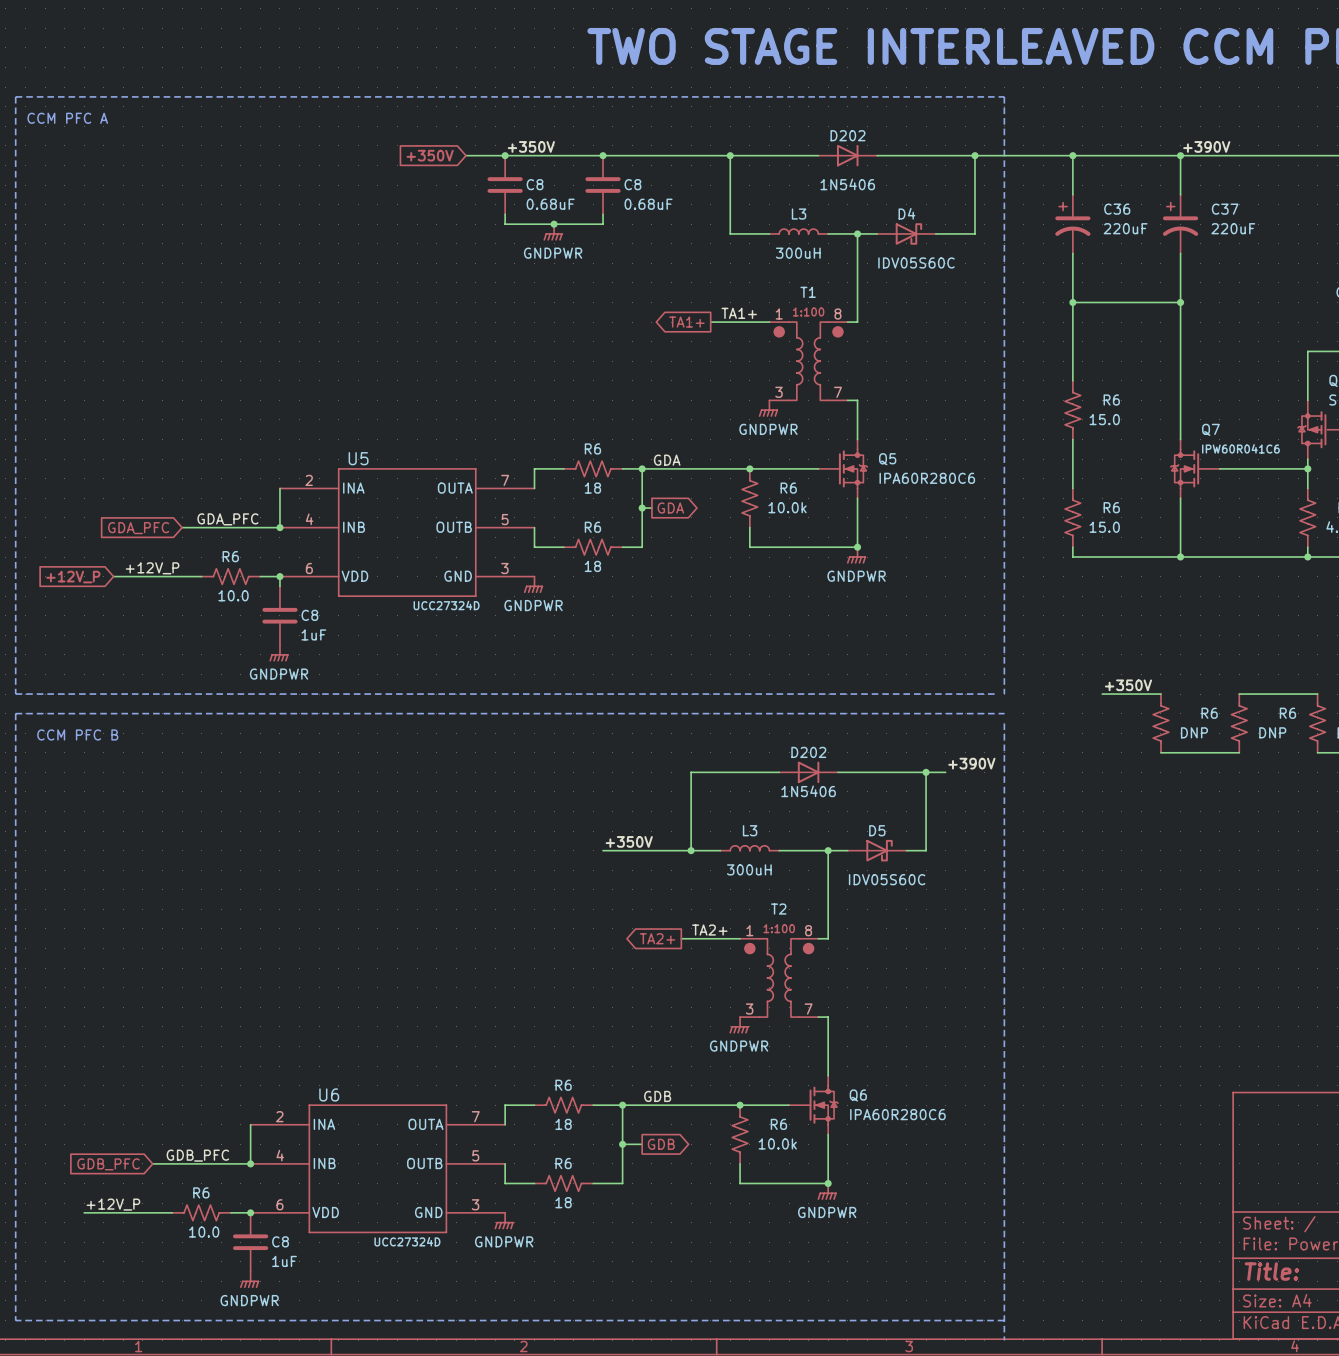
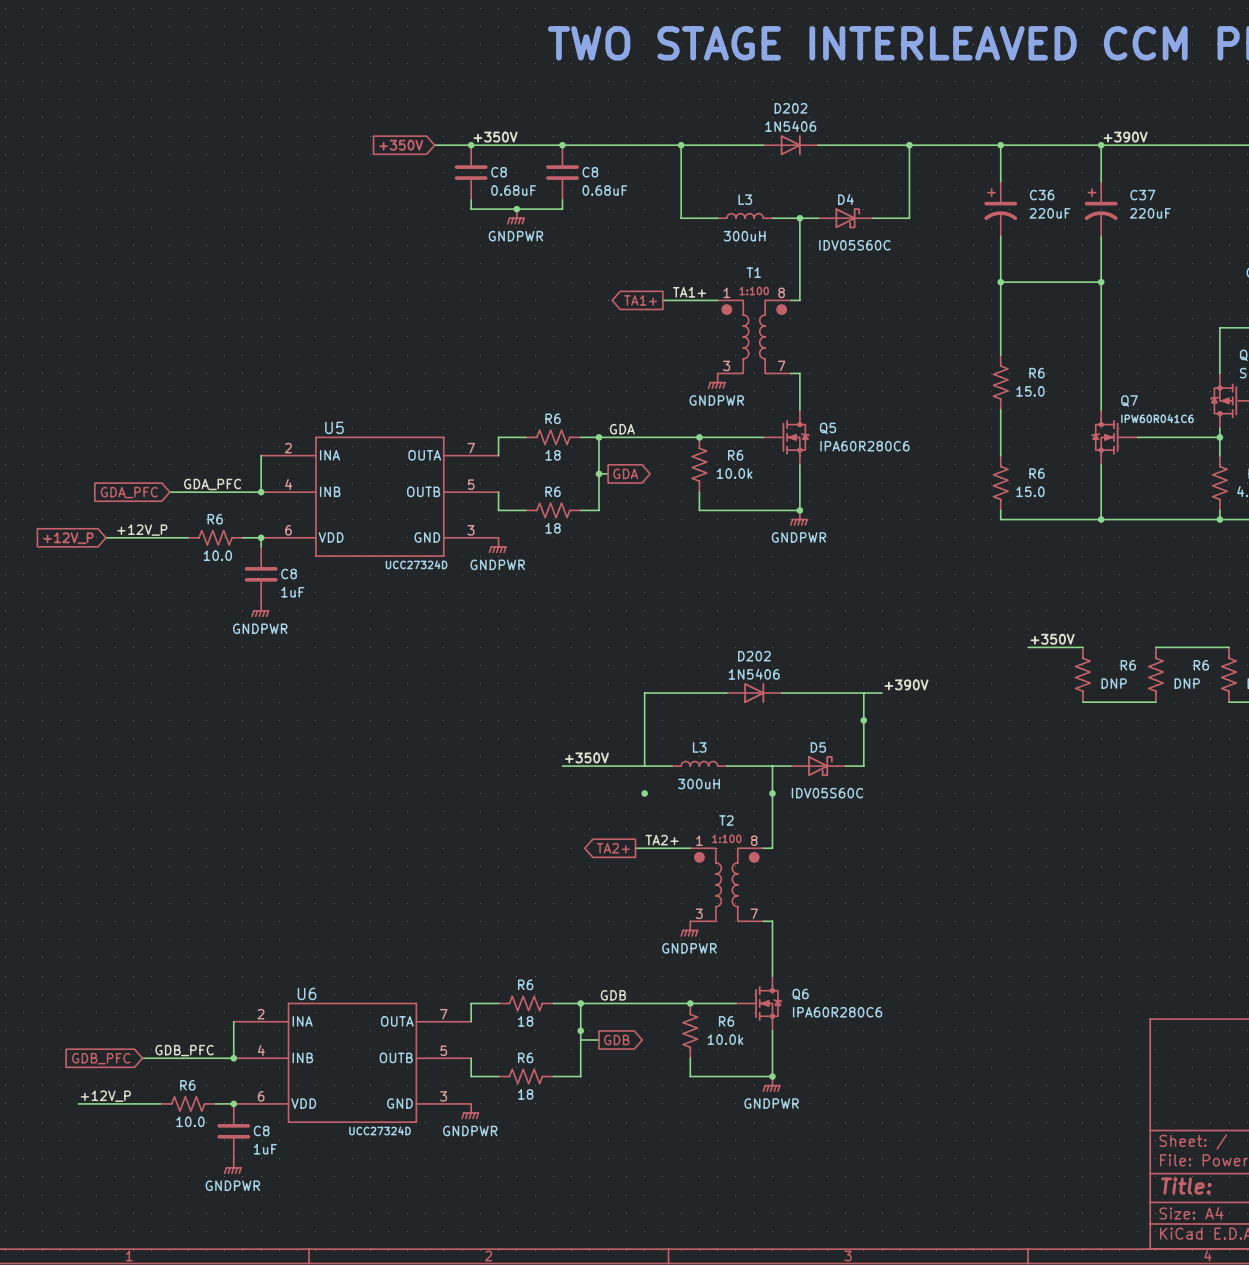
text: CCM PFC A (67, 118) -> none
D202 name position: D202 (847, 135) -> D202 (790, 108)
D202 value position: 1N5406 (847, 184) -> 1N5406 (790, 126)
line: (994, 694) (15, 694) (15, 96) (1004, 96) (1004, 694) -> none
line: (1004, 713) (15, 713) (15, 1320) (1004, 1320) -> none
line: (1004, 723) (1004, 1340) -> none
text: CCM PFC B (77, 734) -> none
wire: none -> (863, 693) (863, 720)
D202 name position: D202 (808, 752) -> D202 (754, 656)
label position: +390V (971, 763) -> +390V (906, 684)
wire: (691, 772) (779, 772) -> (644, 720) (644, 693) (726, 693)
D202 position: (808, 772) -> (754, 693)
wire: (837, 772) (945, 772) -> (781, 693) (882, 693)
D202 value position: 1N5406 (808, 791) -> 1N5406 (754, 674)
wire: (691, 821) (691, 850) -> (772, 766) (772, 793)
wire: (926, 821) (926, 850) (906, 850) -> (863, 766) (845, 766)
label position: +350V (629, 841) -> +350V (586, 757)
L3 position: (749, 848) -> (699, 763)
wire: (603, 850) (720, 850) -> (562, 766) (672, 766)
wire: (779, 850) (847, 850) -> (726, 766) (790, 766)
D5 position: (877, 850) -> (818, 766)
wire: (828, 909) (828, 938) (818, 938) -> (772, 848) (763, 848)
label position: TA2+ (709, 930) -> TA2+ (662, 840)
global label position: TA2+ (657, 938) -> TA2+ (613, 848)
wire: (681, 938) (740, 938) -> (635, 848) (690, 848)
T2 position: (779, 977) -> (726, 884)
wire: (818, 1017) (828, 1017) -> (763, 921) (772, 921) (772, 948)
power symbol position: GNDPWR (739, 1025) -> GNDPWR (689, 928)
R6: none -> 18 (525, 1003)
wire: none -> (580, 1003) (580, 1030)
junction: none -> (580, 1003)
wire: none -> (233, 1021) (233, 1049)
label position: GDB (657, 1096) -> GDB (613, 995)
wire: (534, 1105) (505, 1105) (505, 1124) -> (498, 1003) (471, 1003) (471, 1021)
R6: 18 (563, 1105) -> none
wire: (593, 1105) (789, 1105) -> (553, 1003) (735, 1003)
junction position: (740, 1105) -> (690, 1003)
Q6 position: (813, 1105) -> (758, 1003)
wire: (250, 1134) (250, 1163) (152, 1163) -> (233, 1058) (142, 1058)
junction: none -> (233, 1058)
R6 position: (740, 1134) -> (690, 1030)
wire: (622, 1144) (642, 1144) -> (580, 1040) (599, 1040)
junction: (622, 1144) -> none
global label position: GDB (661, 1144) -> GDB (616, 1040)
R6: none -> 18 (525, 1076)
wire: (622, 1154) (622, 1183) (593, 1183) -> (580, 1076) (553, 1076)
wire: (828, 1154) (828, 1183) (740, 1183) (740, 1163) -> (772, 1076) (690, 1076) (690, 1058)
label position: GDB_PFC (197, 1155) -> GDB_PFC (184, 1050)
junction: (250, 1163) -> none
wire: (505, 1163) (505, 1183) (534, 1183) -> (471, 1058) (471, 1076) (498, 1076)
global label position: GDB_PFC (108, 1164) -> GDB_PFC (101, 1058)
U6 position: (377, 1168) -> (352, 1062)
junction: none -> (233, 1103)
R6: 18 (563, 1183) -> none
junction position: (828, 1183) -> (772, 1076)
power symbol position: GNDPWR (827, 1191) -> GNDPWR (771, 1084)
label position: +12V_P (113, 1204) -> +12V_P (105, 1096)
wire: (84, 1212) (172, 1212) -> (78, 1103) (160, 1103)
R6 position: (201, 1212) -> (188, 1103)
wire: (231, 1212) (250, 1212) -> (215, 1103) (233, 1103)
junction: (250, 1212) -> none
power symbol position: GNDPWR (504, 1221) -> GNDPWR (470, 1111)
C8 position: (250, 1242) -> (233, 1131)
power symbol position: GNDPWR (249, 1279) -> GNDPWR (232, 1166)

